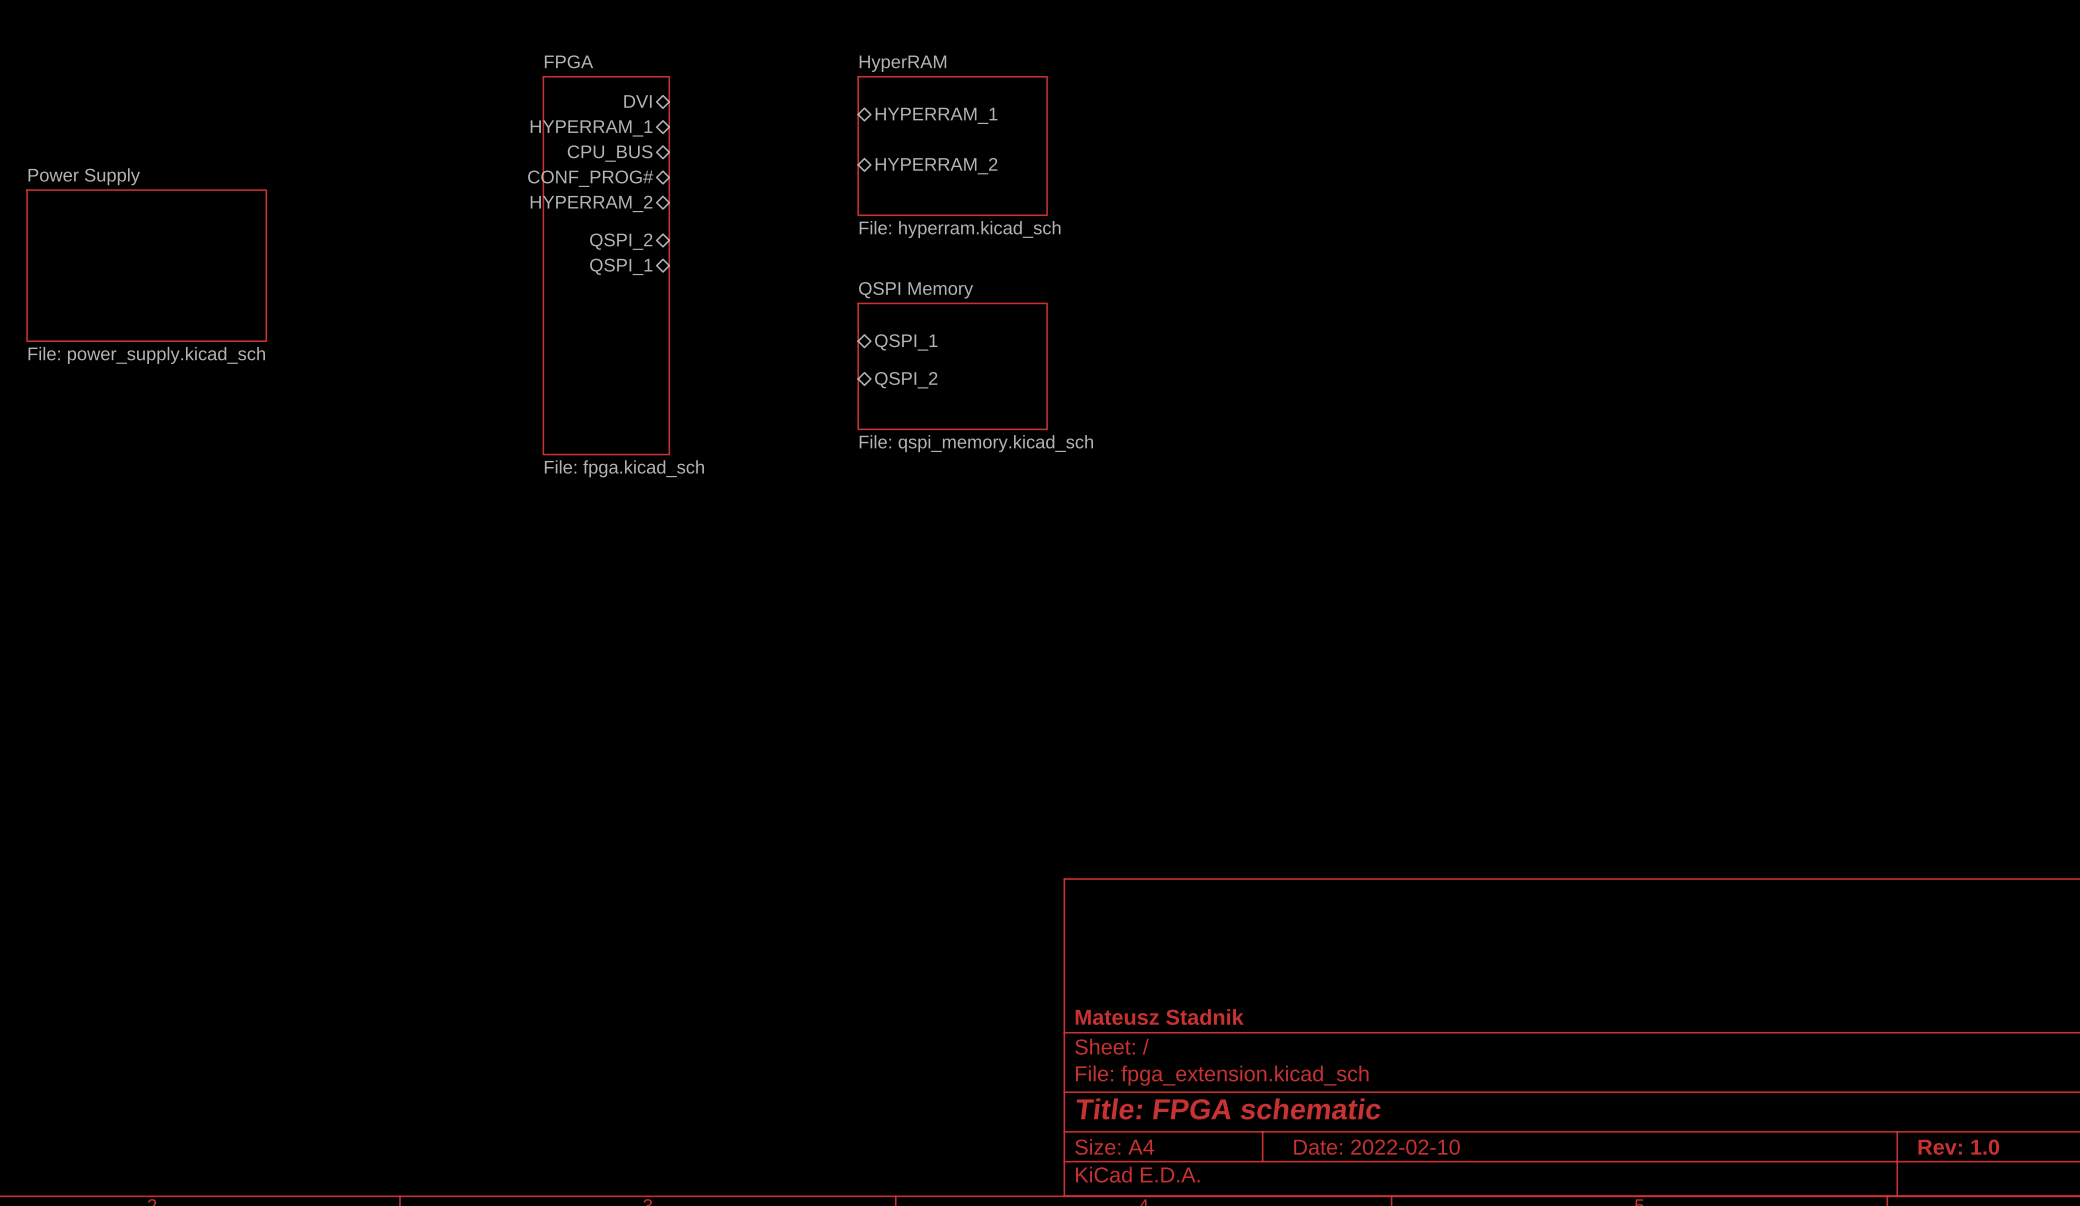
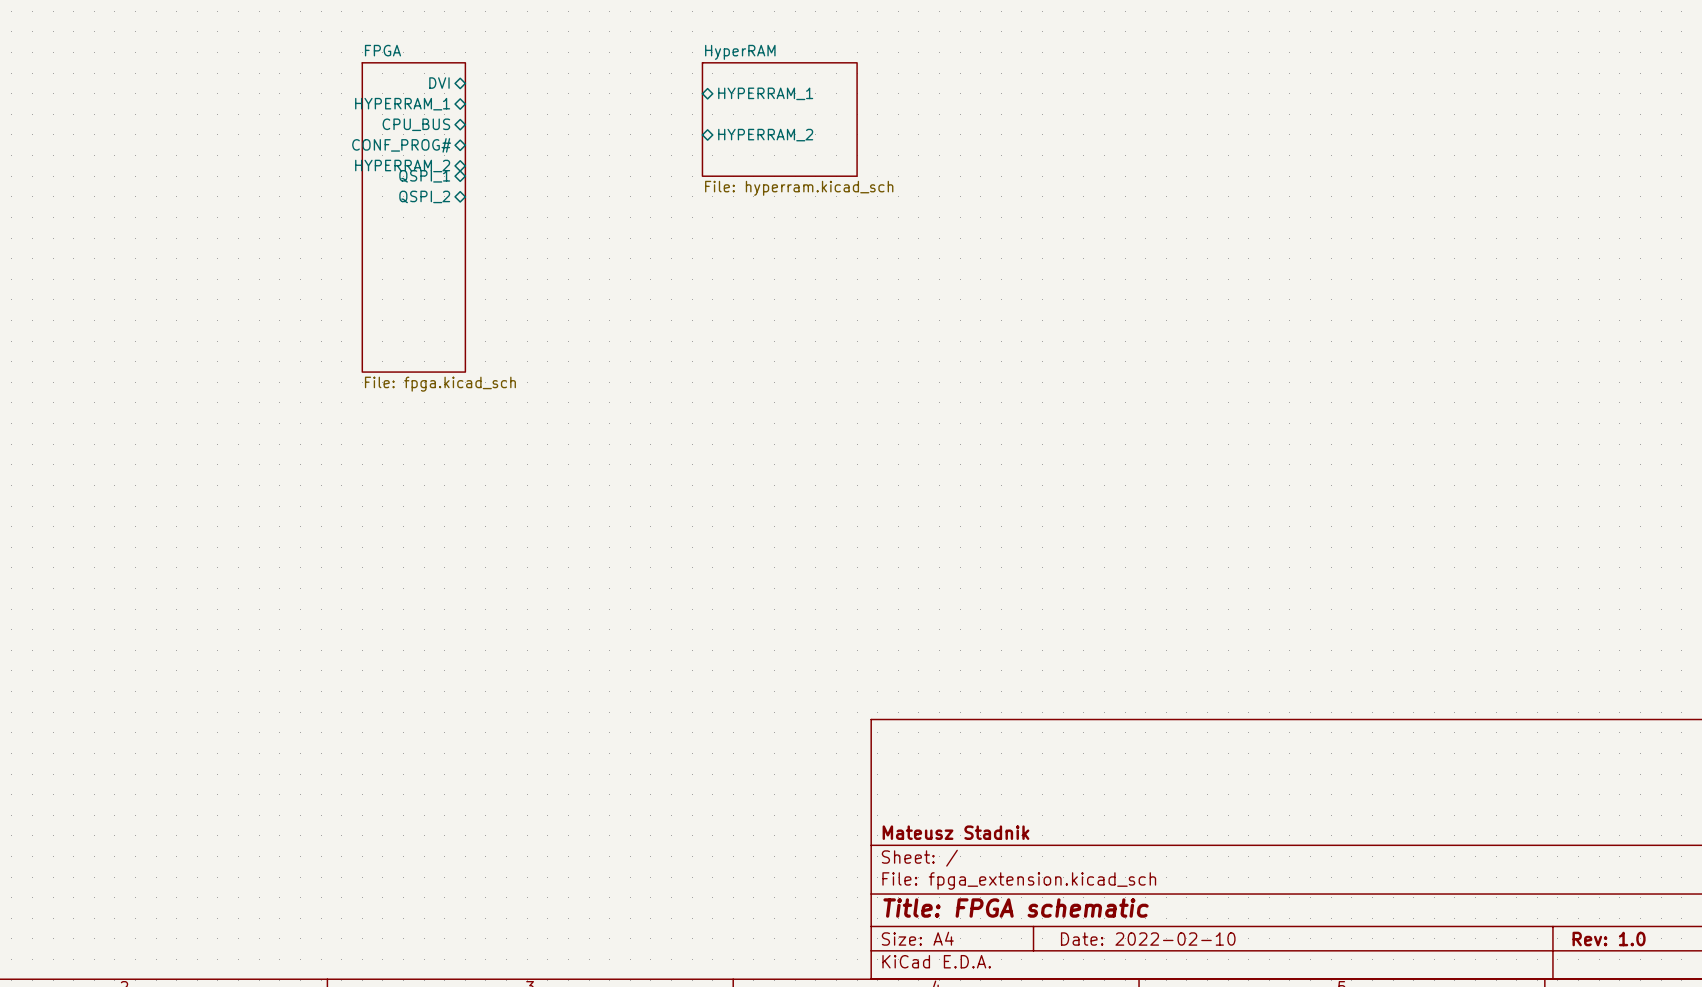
sheet pin position: DVI (637, 101) -> DVI (439, 83)
sheet pin position: HYPERRAM_1 (591, 128) -> HYPERRAM_1 (402, 104)
sheet pin position: CPU_BUS (610, 153) -> CPU_BUS (416, 124)
sheet pin position: CONF_PROG# (590, 178) -> CONF_PROG# (401, 145)
sheet pin position: HYPERRAM_2 (591, 203) -> HYPERRAM_2 (402, 166)
sheet pin position: QSPI_2 (621, 241) -> QSPI_2 (424, 196)
sheet Power Supply: File: power_supply.kicad_sch (146, 265) -> none
sheet FPGA position: (606, 265) -> (413, 217)
sheet pin position: QSPI_1 (621, 266) -> QSPI_1 (424, 176)
sheet pin: QSPI_1 (906, 342) -> none
sheet QSPI Memory: File: qspi_memory.kicad_sch (952, 366) -> none
sheet pin: QSPI_2 (906, 380) -> none

